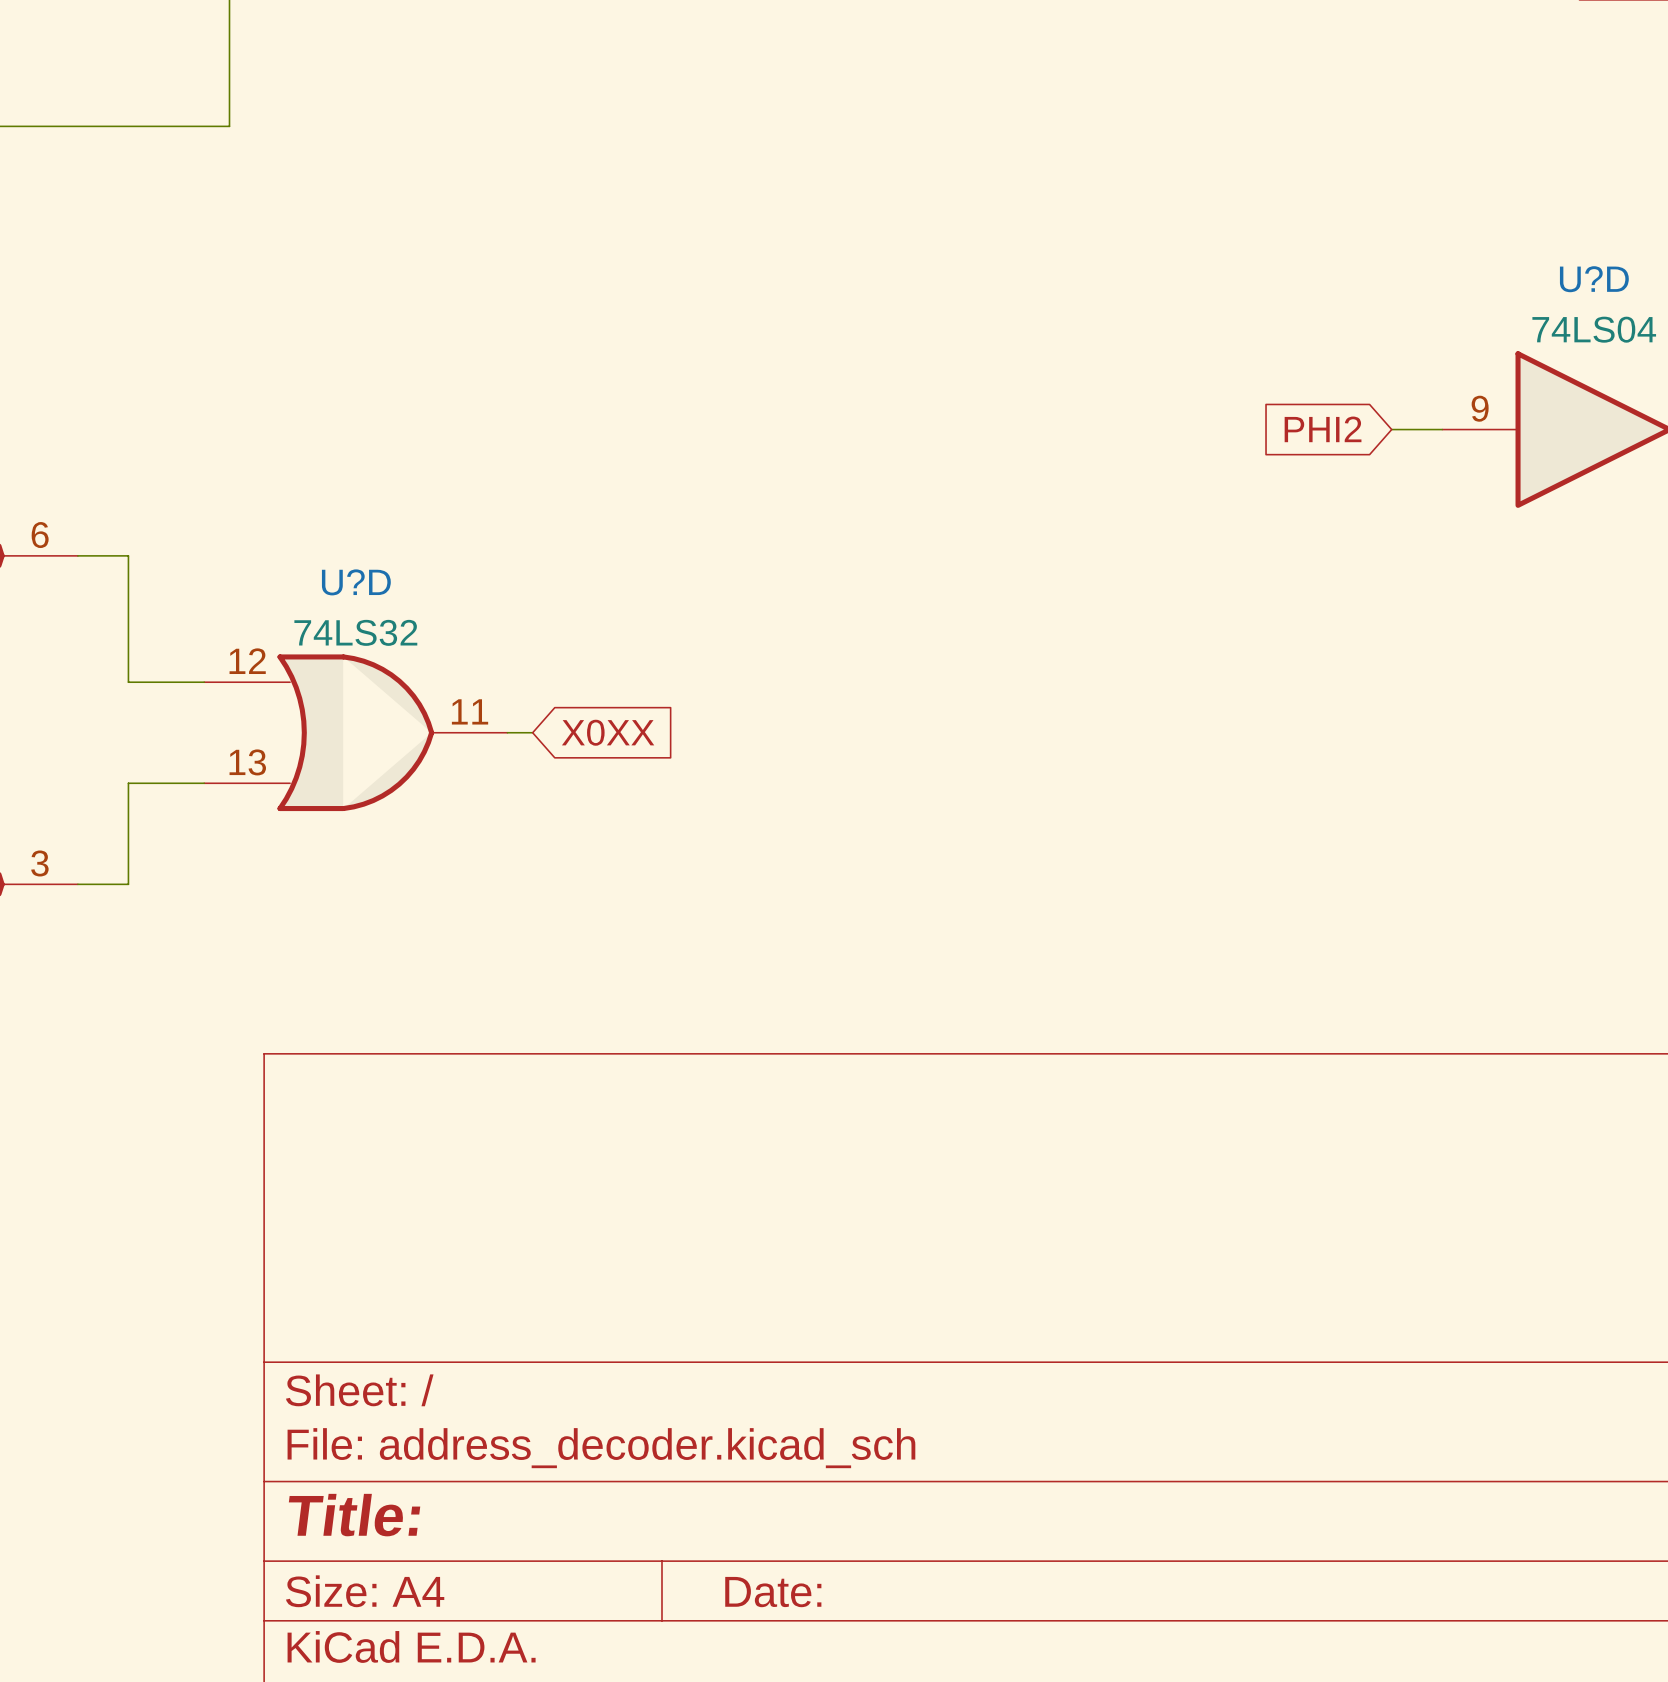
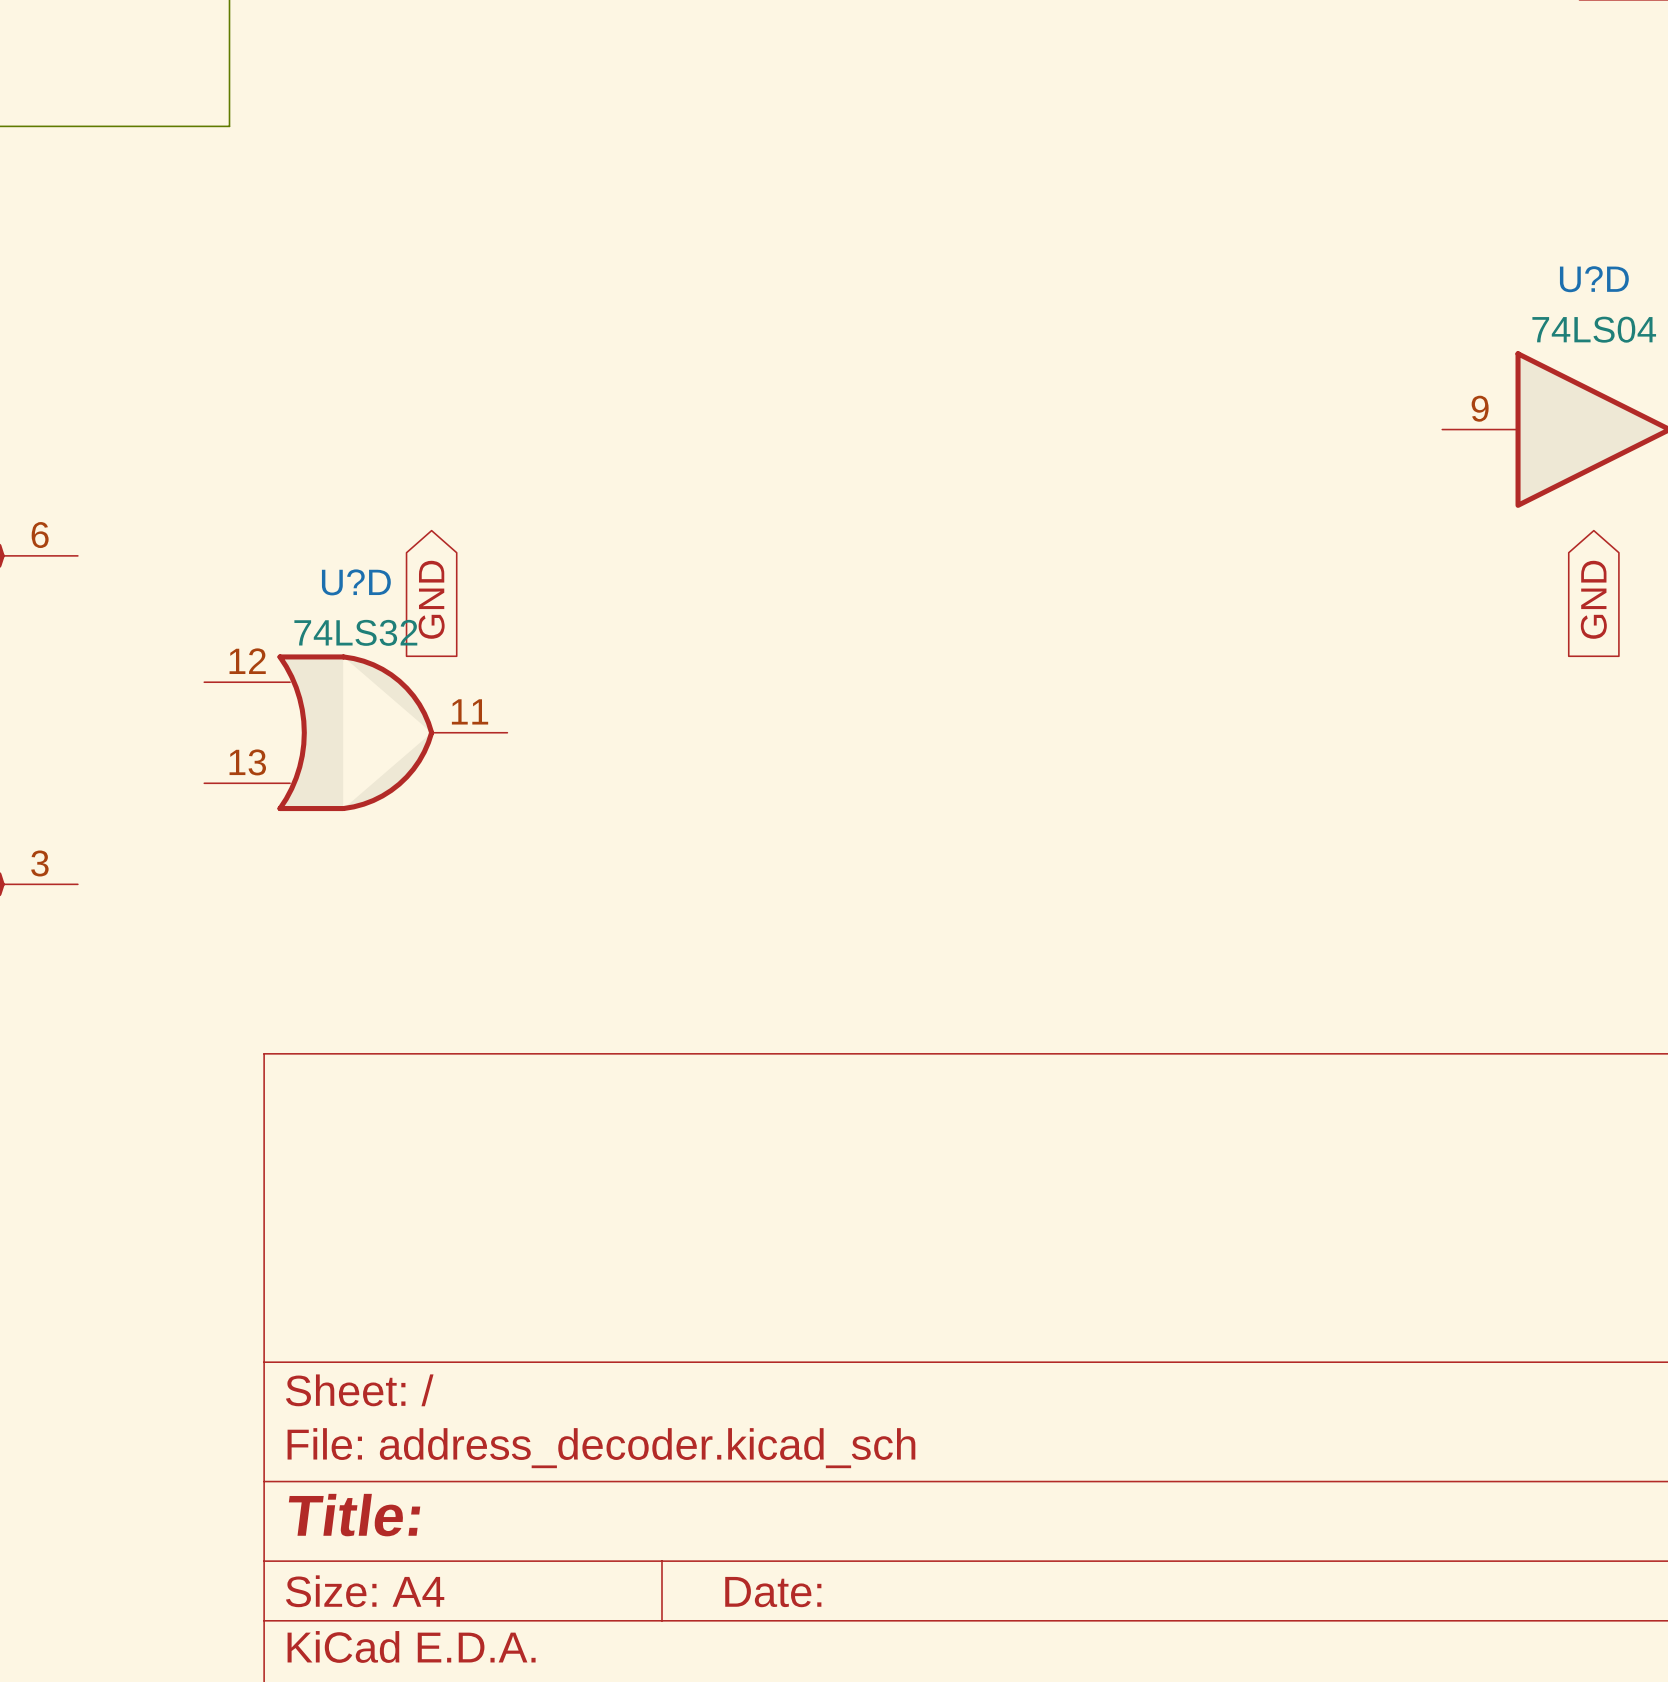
global label: PHI2 (1323, 429) -> none
wire: (1391, 429) (1442, 429) -> none
wire: (77, 555) (128, 555) (128, 682) (204, 682) -> none
global label: none -> GND (431, 599)
global label: none -> GND (1593, 599)
wire: (507, 732) (532, 732) -> none
global label: X0XX (608, 732) -> none
wire: (204, 783) (128, 783) (128, 884) (77, 884) -> none

